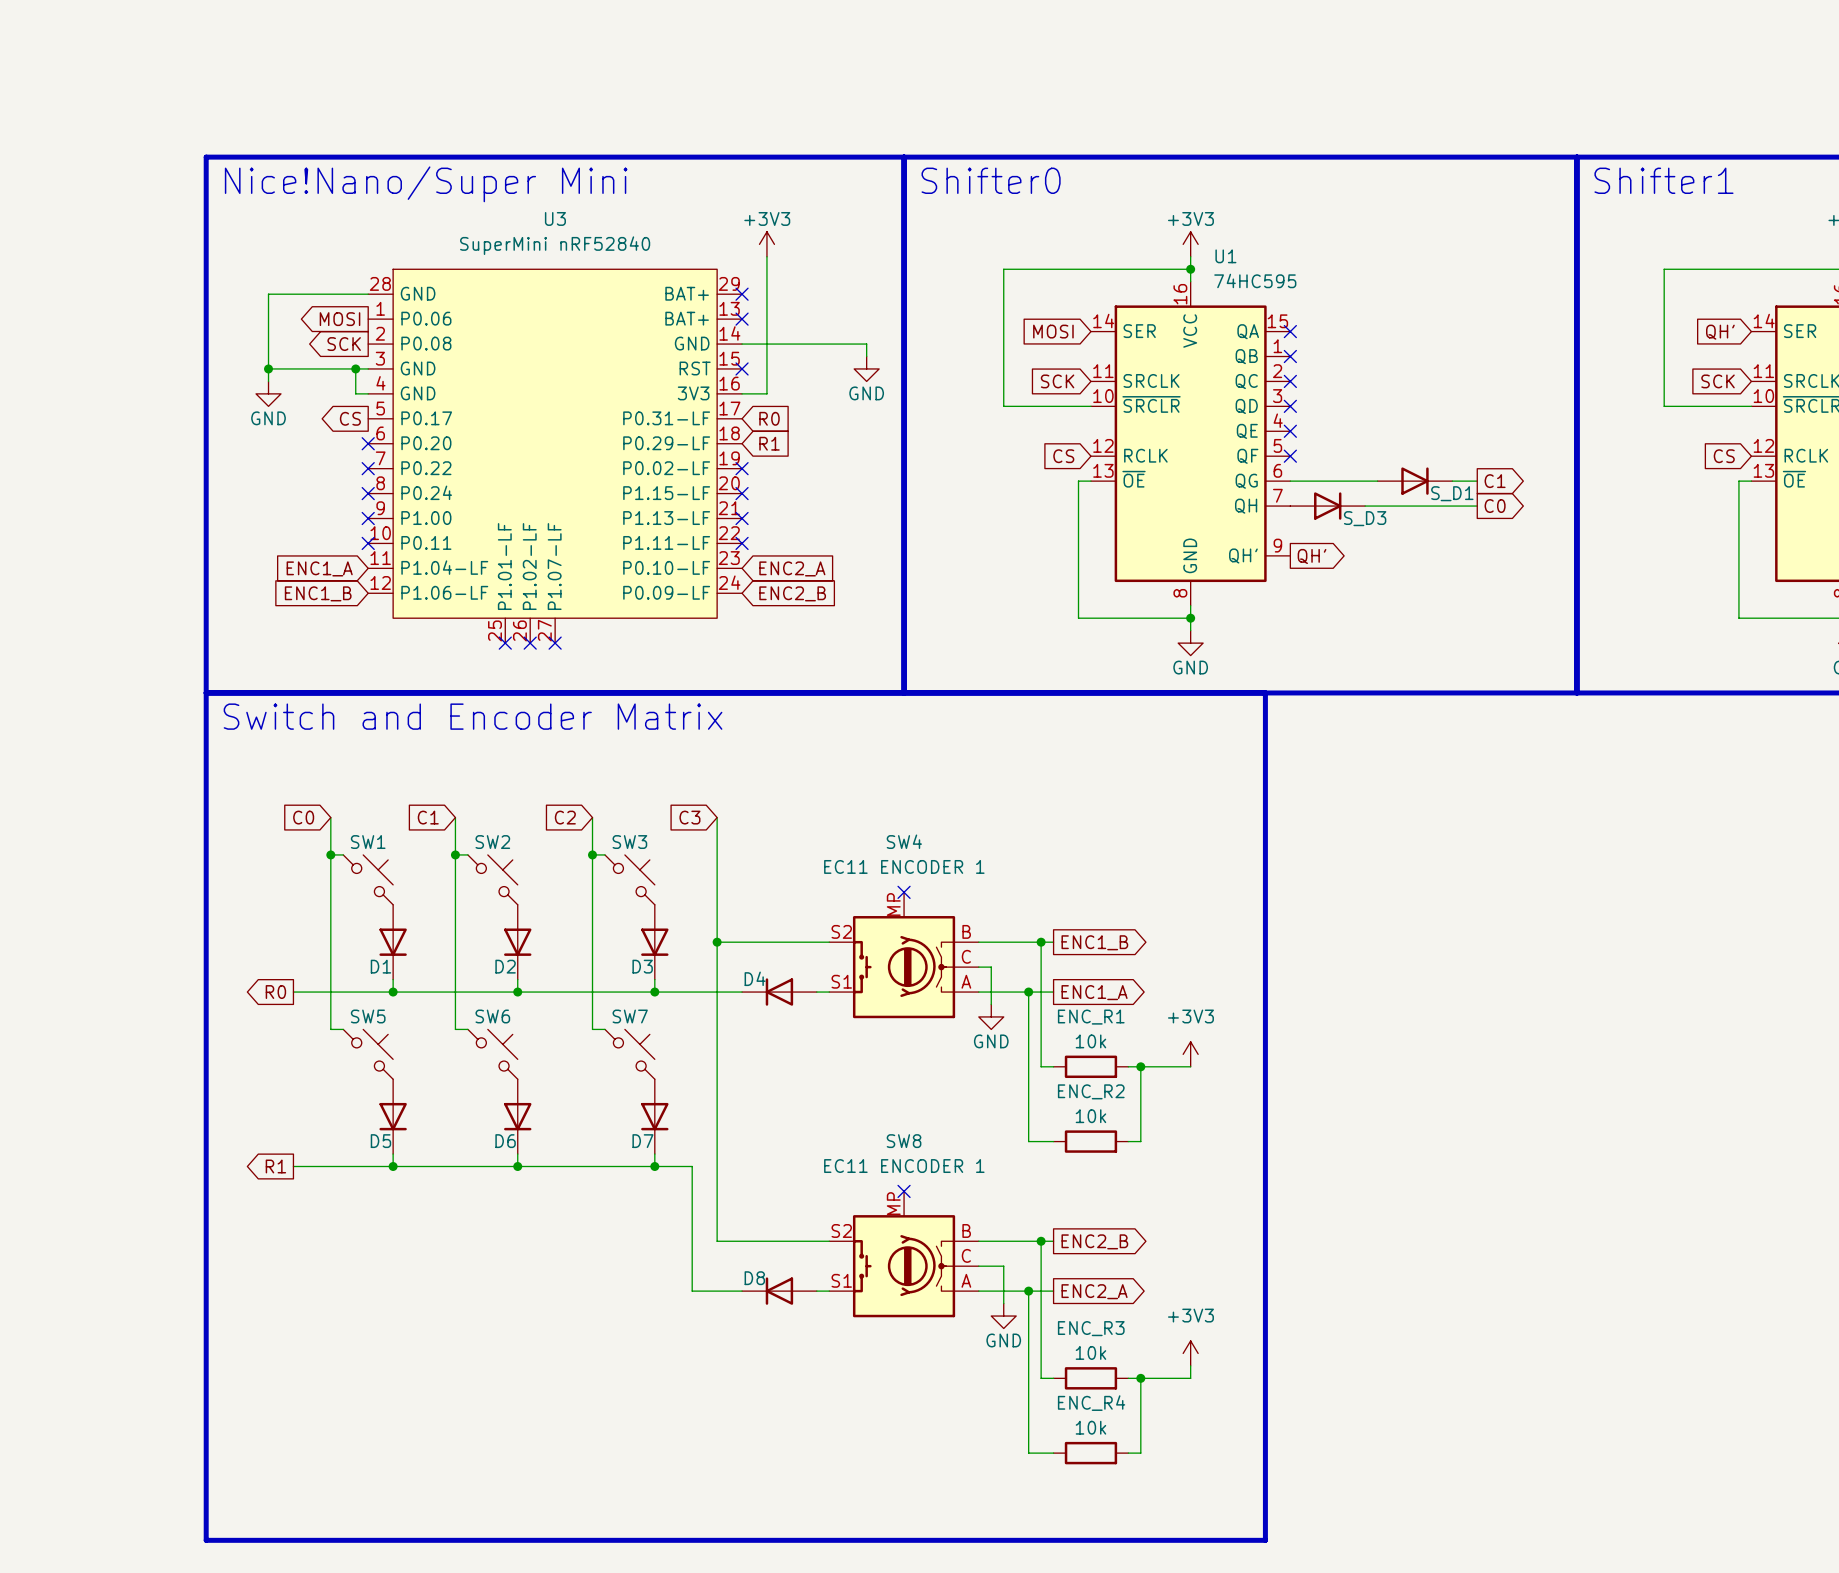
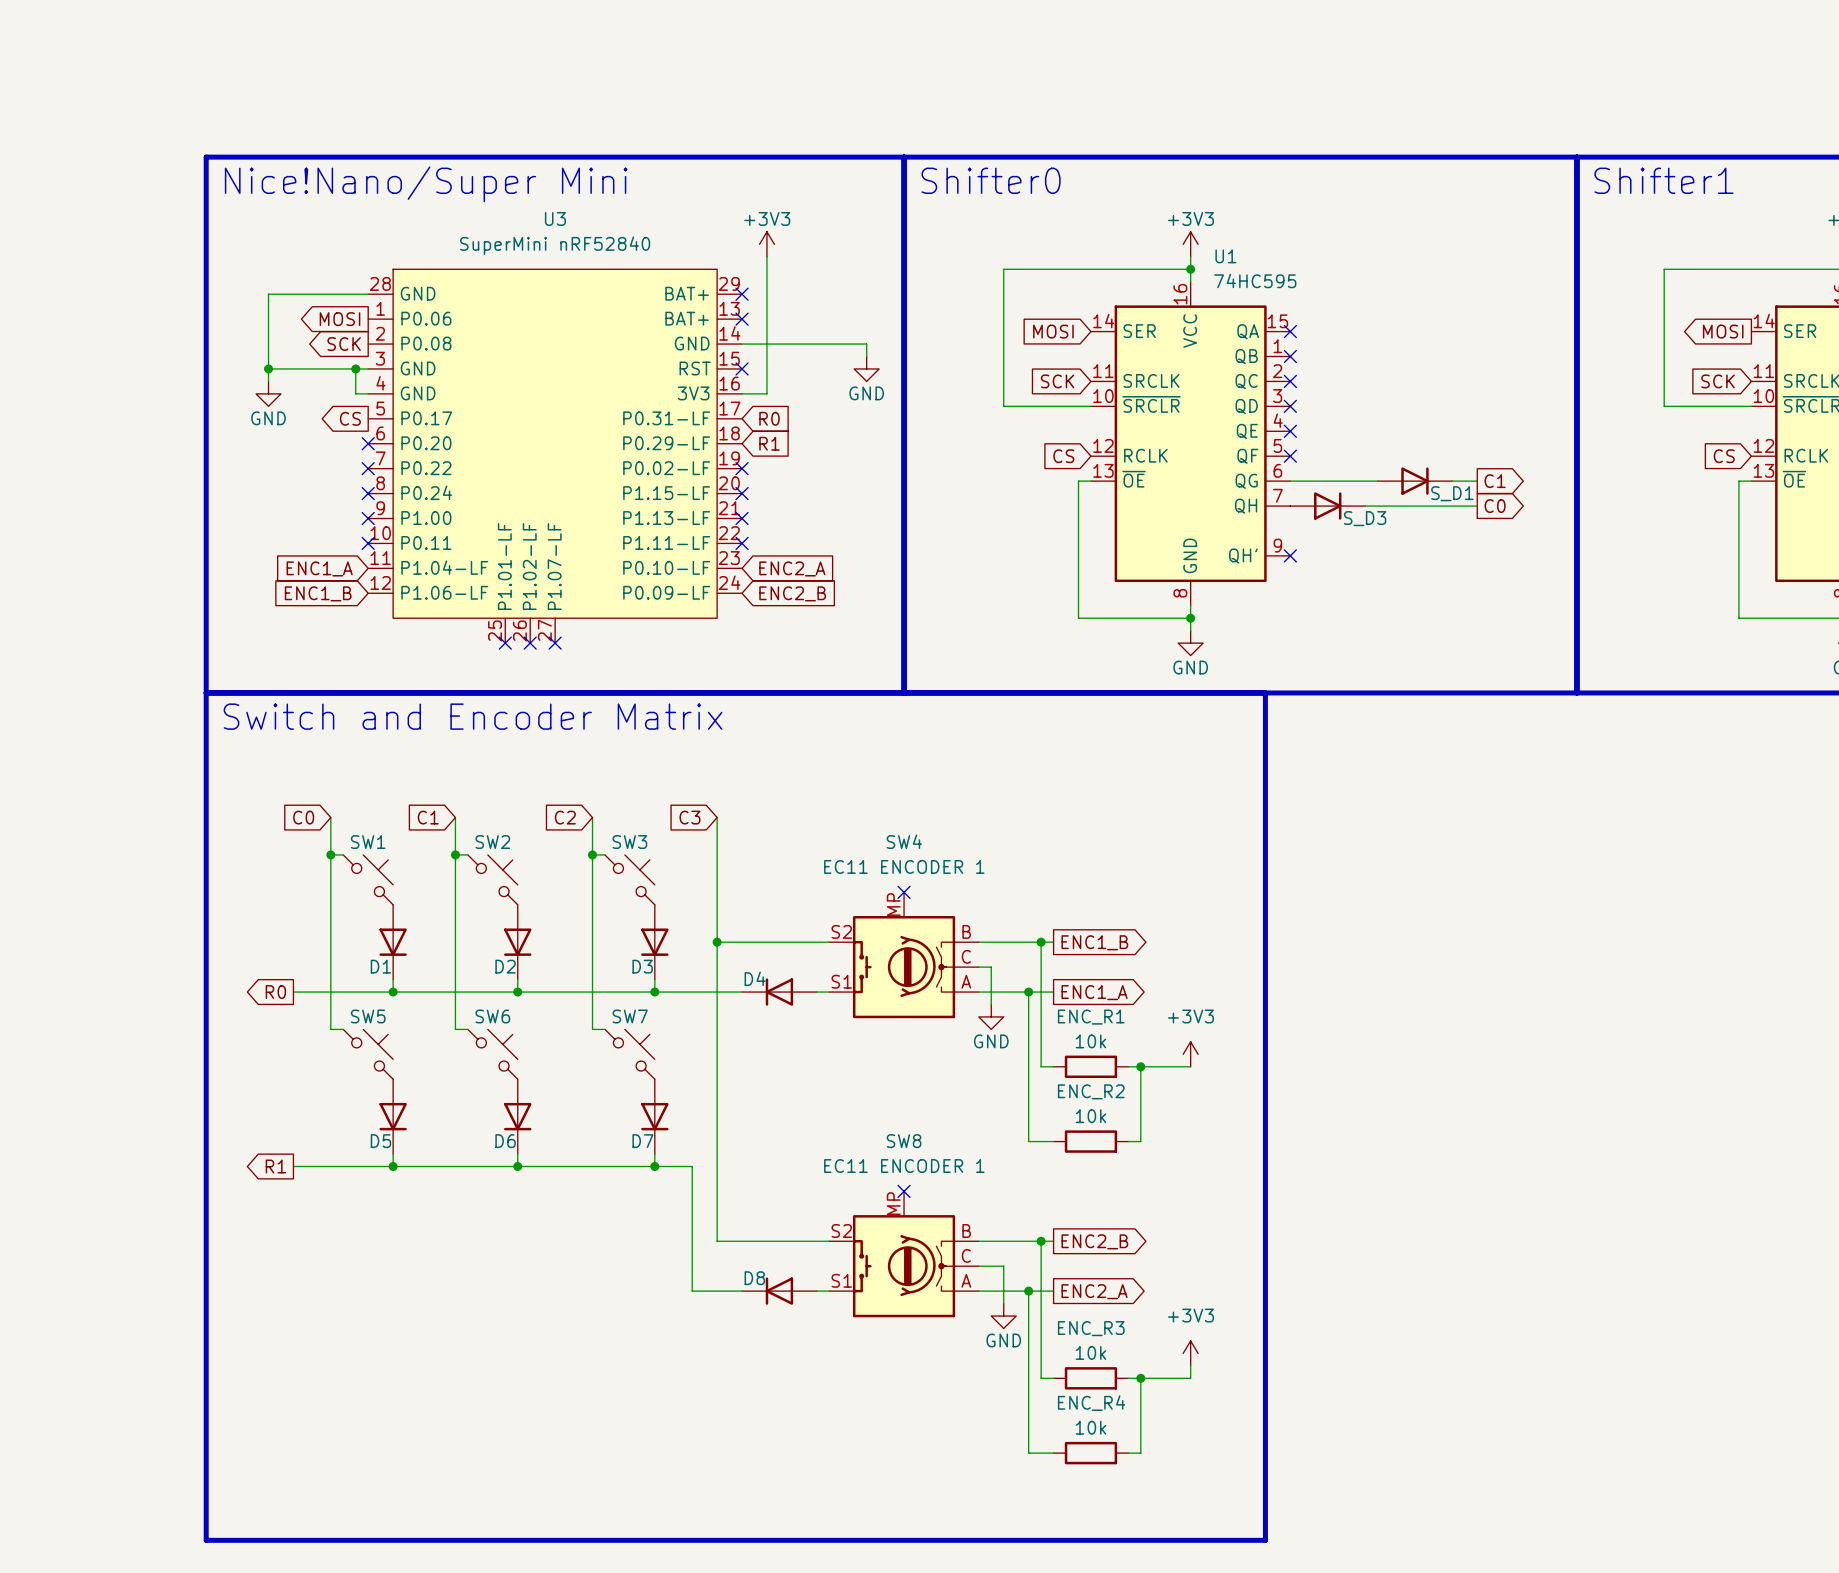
global label shape: input (1720, 332) -> output (1723, 331)
global label: QH' (1720, 332) -> MOSI (1723, 331)
no-connect mark: none -> (1290, 555)
global label: QH' (1312, 556) -> none

